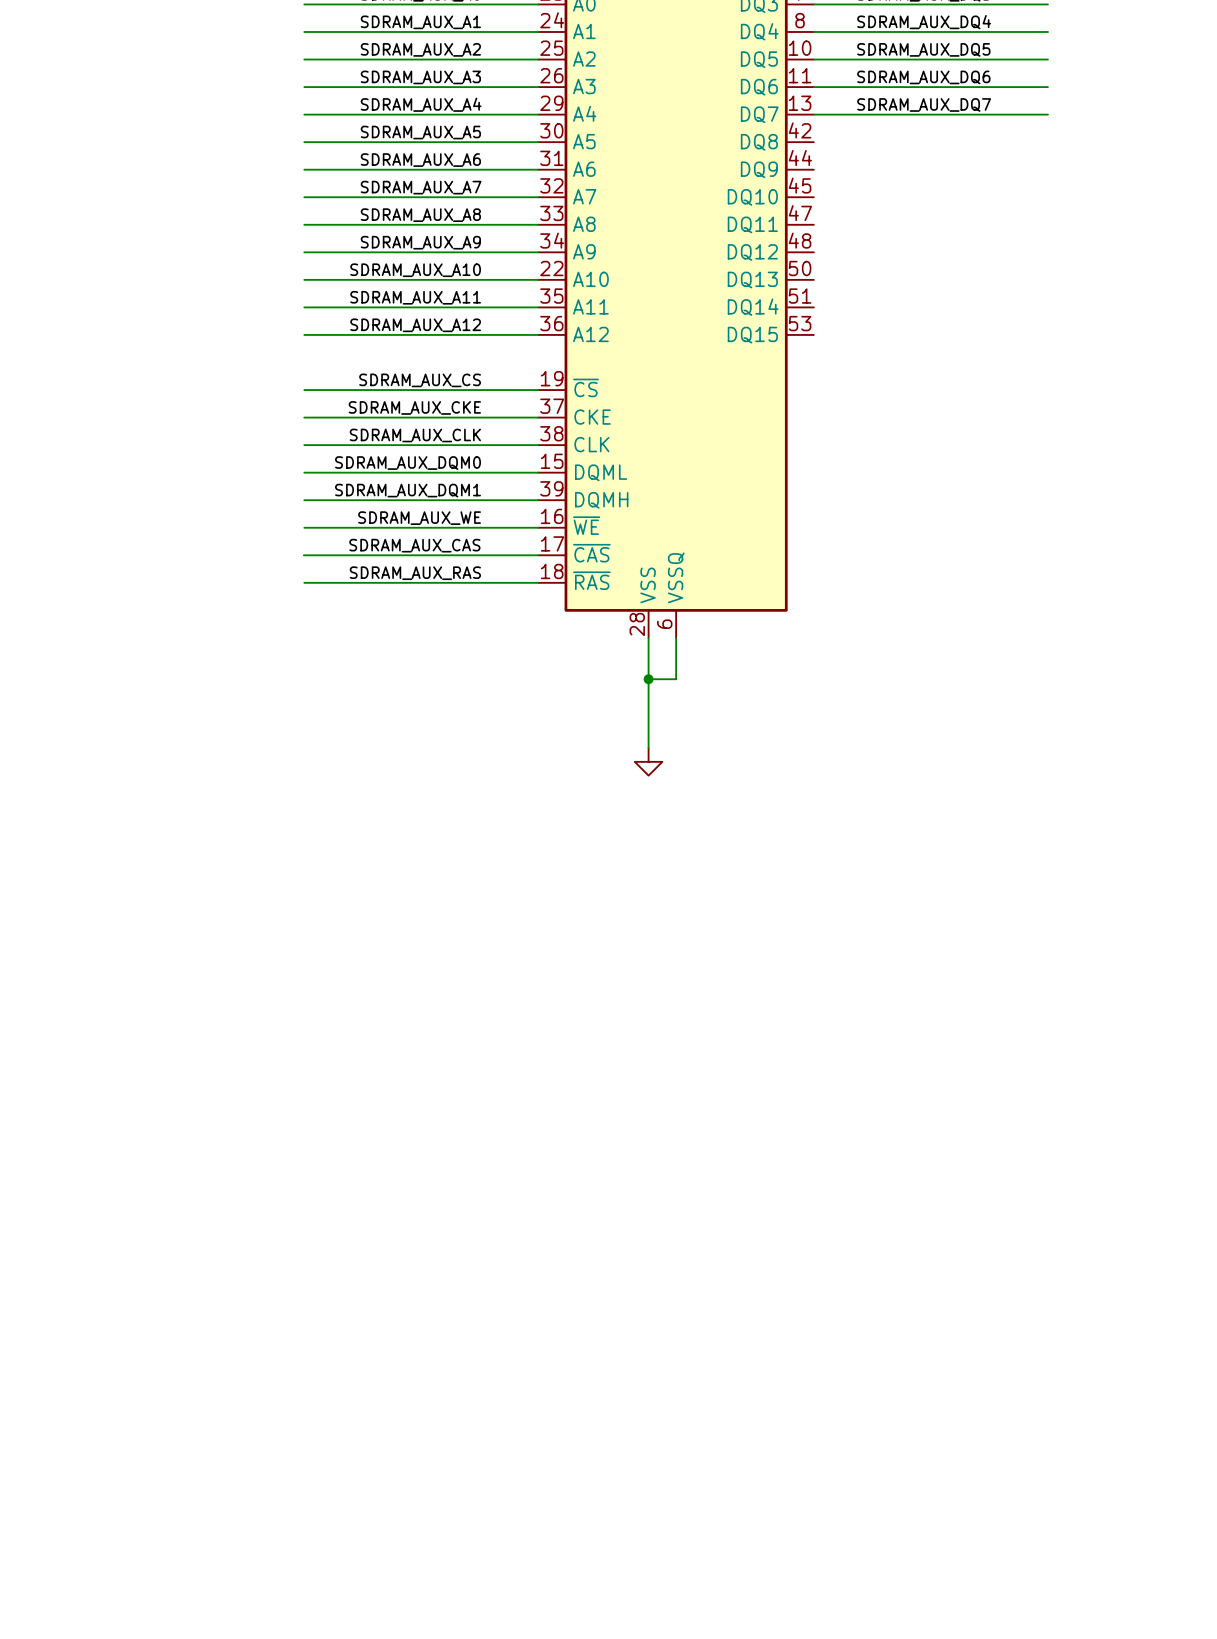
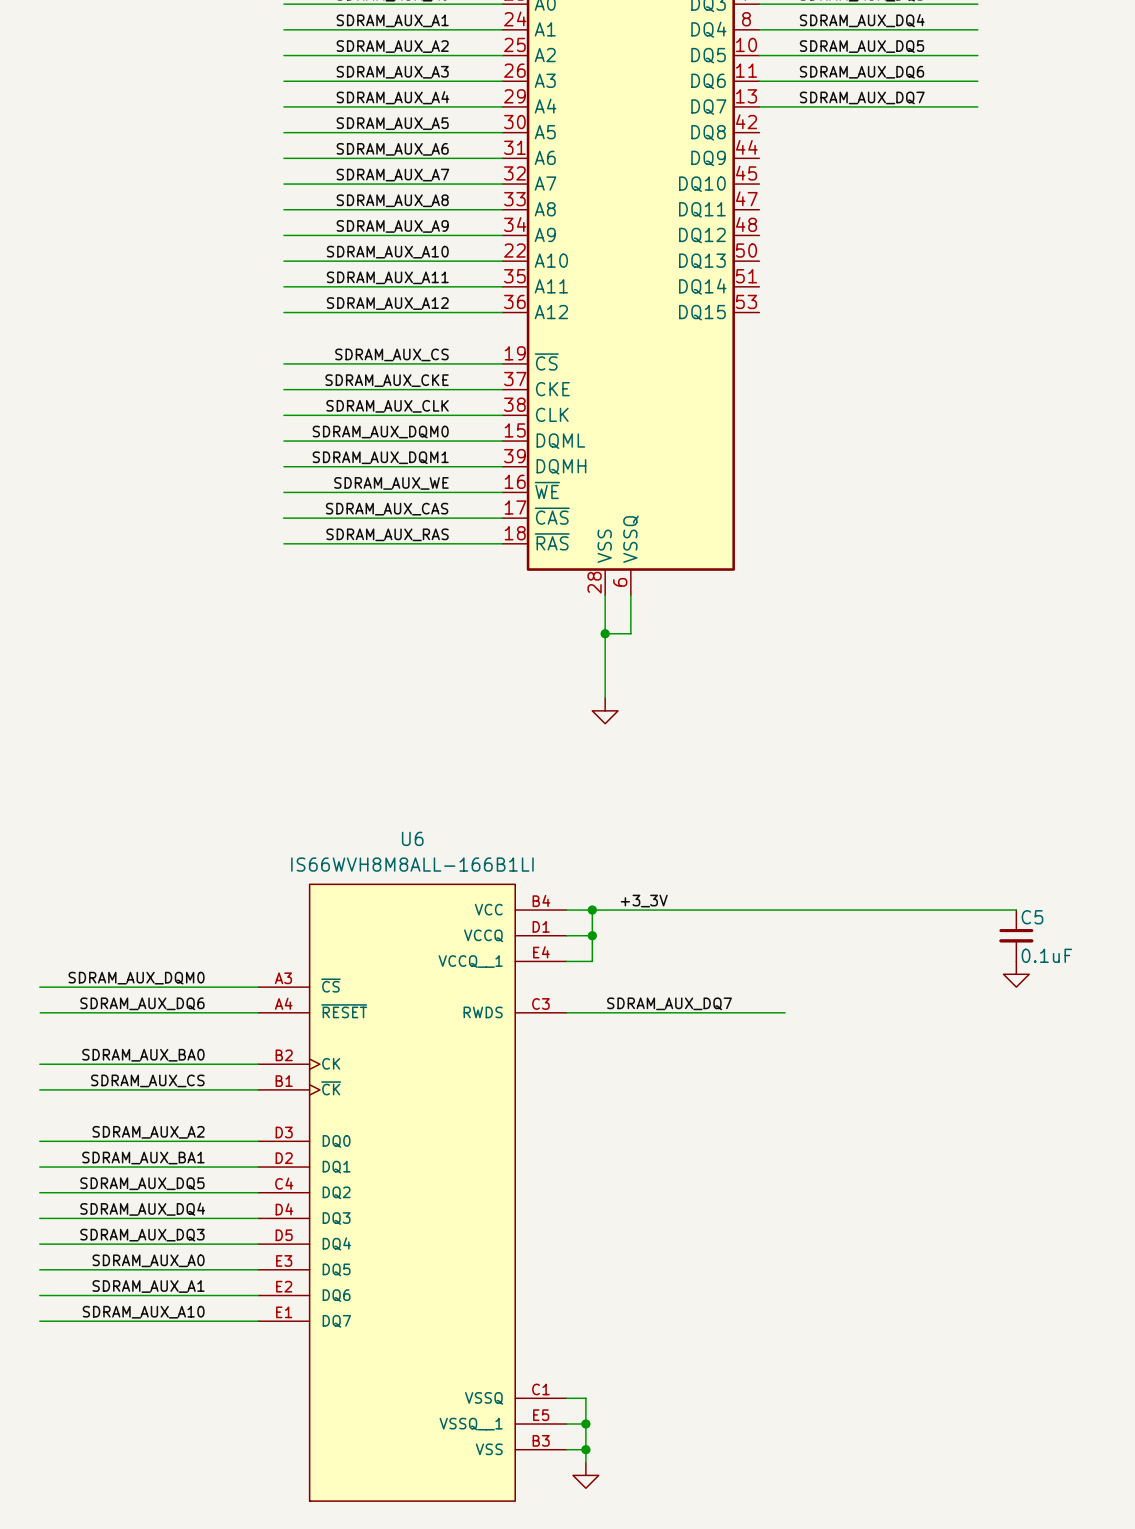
label: none -> +3_3V (644, 901)
wire: none -> (566, 910) (1016, 910)
wire: none -> (592, 910) (592, 961) (566, 961)
junction: none -> (592, 910)
wire: none -> (566, 935) (592, 935)
junction: none -> (592, 935)
C5: none -> 0.1uF (1016, 935)
power symbol: none -> (1016, 974)
label: none -> SDRAM_AUX_DQM0 (136, 978)
wire: none -> (39, 987) (258, 987)
label: none -> SDRAM_AUX_DQ6 (142, 1003)
label: none -> SDRAM_AUX_DQ7 (669, 1003)
wire: none -> (40, 1012) (258, 1012)
wire: none -> (566, 1012) (785, 1012)
label: none -> SDRAM_AUX_BA0 (143, 1055)
wire: none -> (39, 1064) (258, 1064)
label: none -> SDRAM_AUX_CS (147, 1080)
wire: none -> (39, 1089) (258, 1089)
label: none -> SDRAM_AUX_A2 (148, 1132)
wire: none -> (39, 1141) (258, 1141)
label: none -> SDRAM_AUX_BA1 (143, 1158)
wire: none -> (39, 1167) (258, 1167)
label: none -> SDRAM_AUX_DQ5 (142, 1183)
wire: none -> (39, 1192) (258, 1192)
U6: none -> IS66WVH8M8ALL-166B1LI (412, 1192)
label: none -> SDRAM_AUX_DQ4 (142, 1209)
wire: none -> (39, 1218) (258, 1218)
label: none -> SDRAM_AUX_DQ3 (142, 1235)
wire: none -> (39, 1244) (258, 1244)
label: none -> SDRAM_AUX_A0 (148, 1260)
wire: none -> (39, 1269) (258, 1269)
label: none -> SDRAM_AUX_A1 (148, 1286)
wire: none -> (39, 1295) (258, 1295)
label: none -> SDRAM_AUX_A10 (143, 1312)
wire: none -> (39, 1321) (258, 1321)
wire: none -> (566, 1398) (585, 1398) (585, 1462)
wire: none -> (566, 1424) (585, 1424)
junction: none -> (585, 1424)
wire: none -> (566, 1449) (585, 1449)
junction: none -> (585, 1449)
power symbol: none -> (585, 1475)

